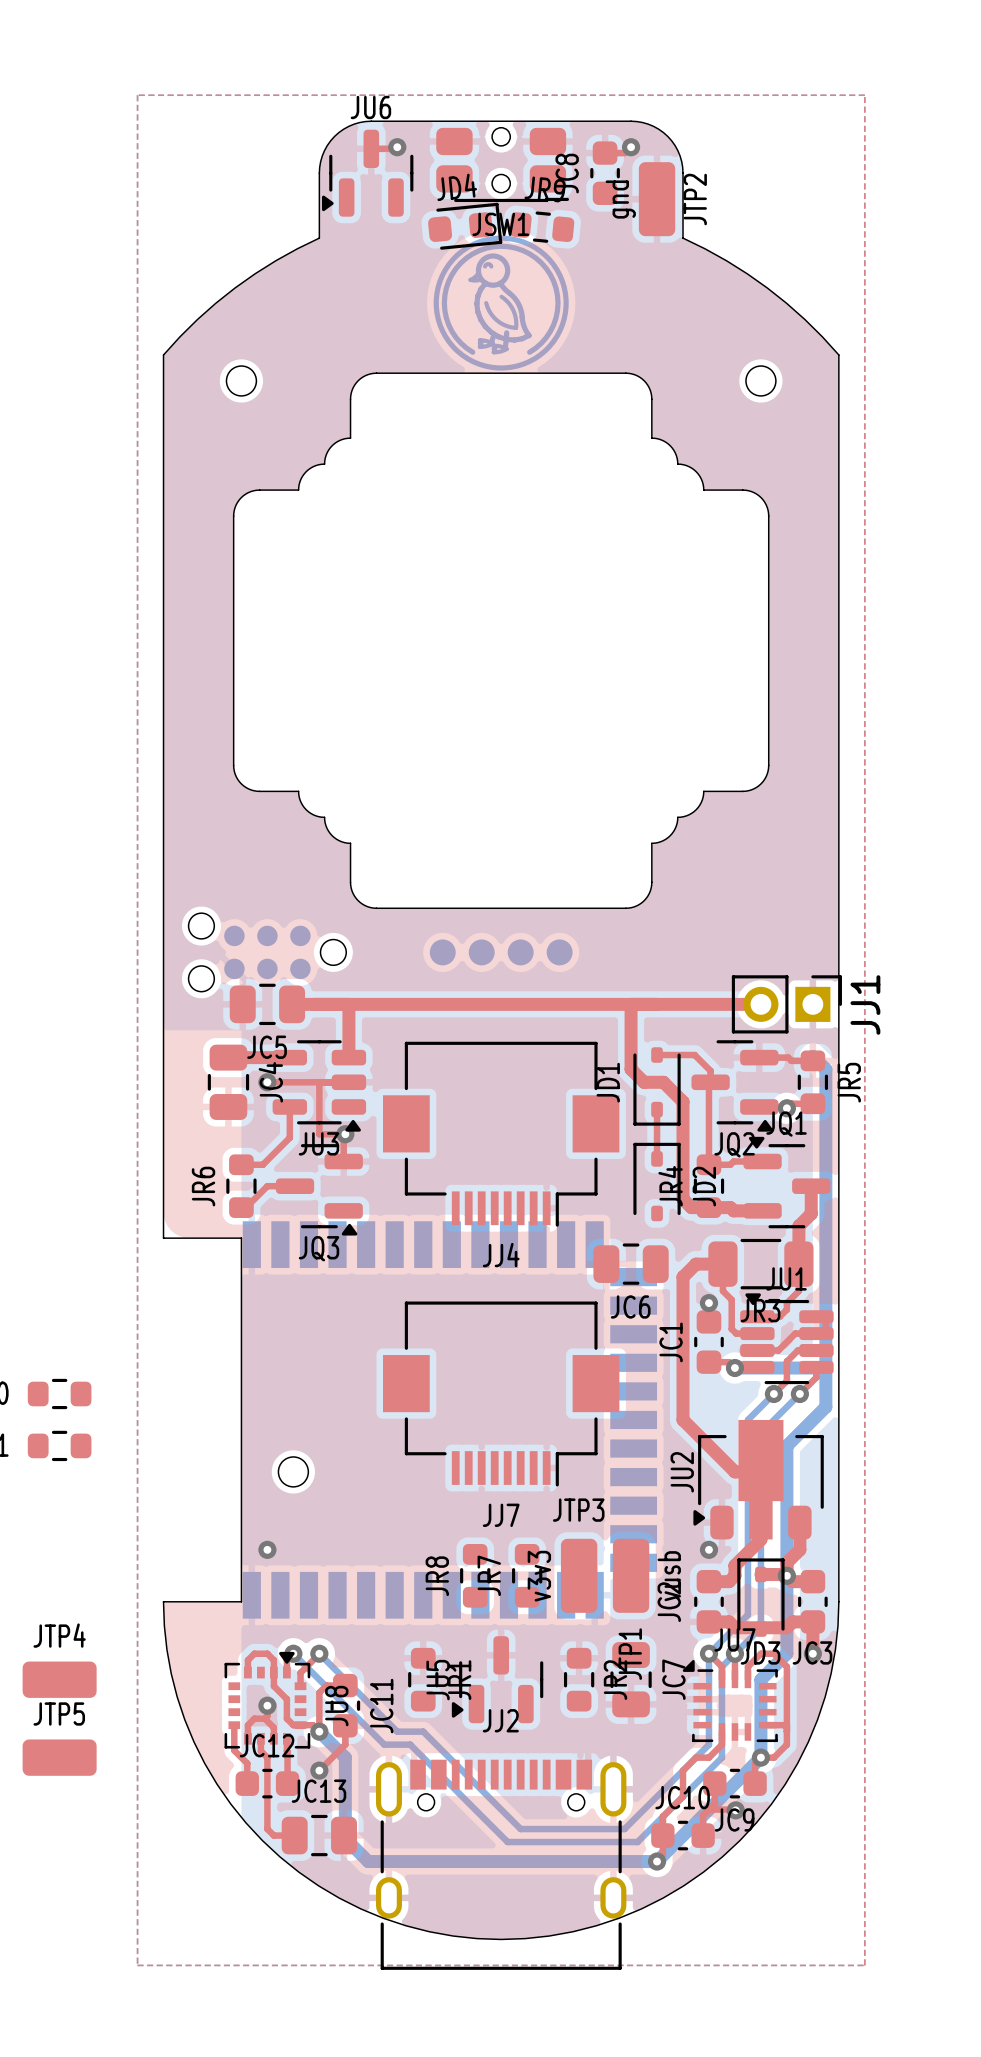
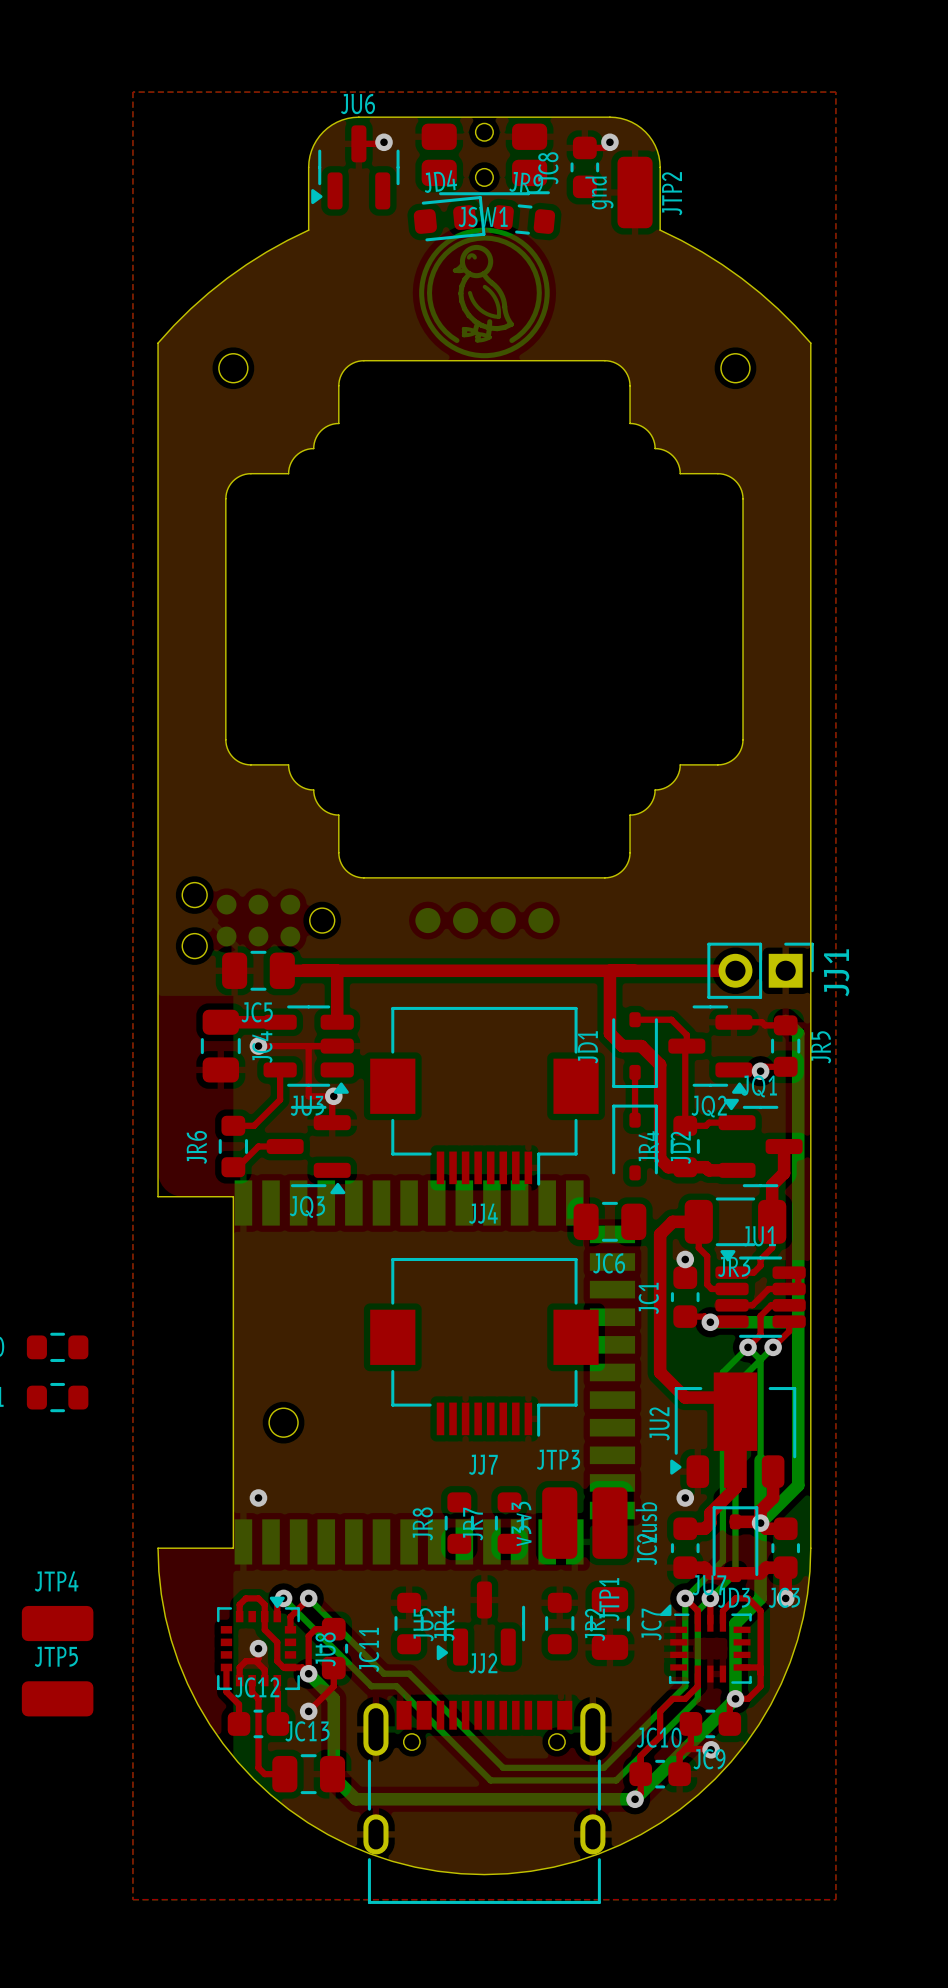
bottom track: (825, 1406) (786, 1445) -> (748, 1347) (760, 1359) (760, 1397)
bottom track: none -> (798, 1359) (798, 1485) (760, 1523)
top track: (708, 1445) (734, 1471) (760, 1471) -> (685, 1397) (735, 1397)
bottom track width: thick (786, 1445) (786, 1510) -> thin (760, 1397) (760, 1460)

